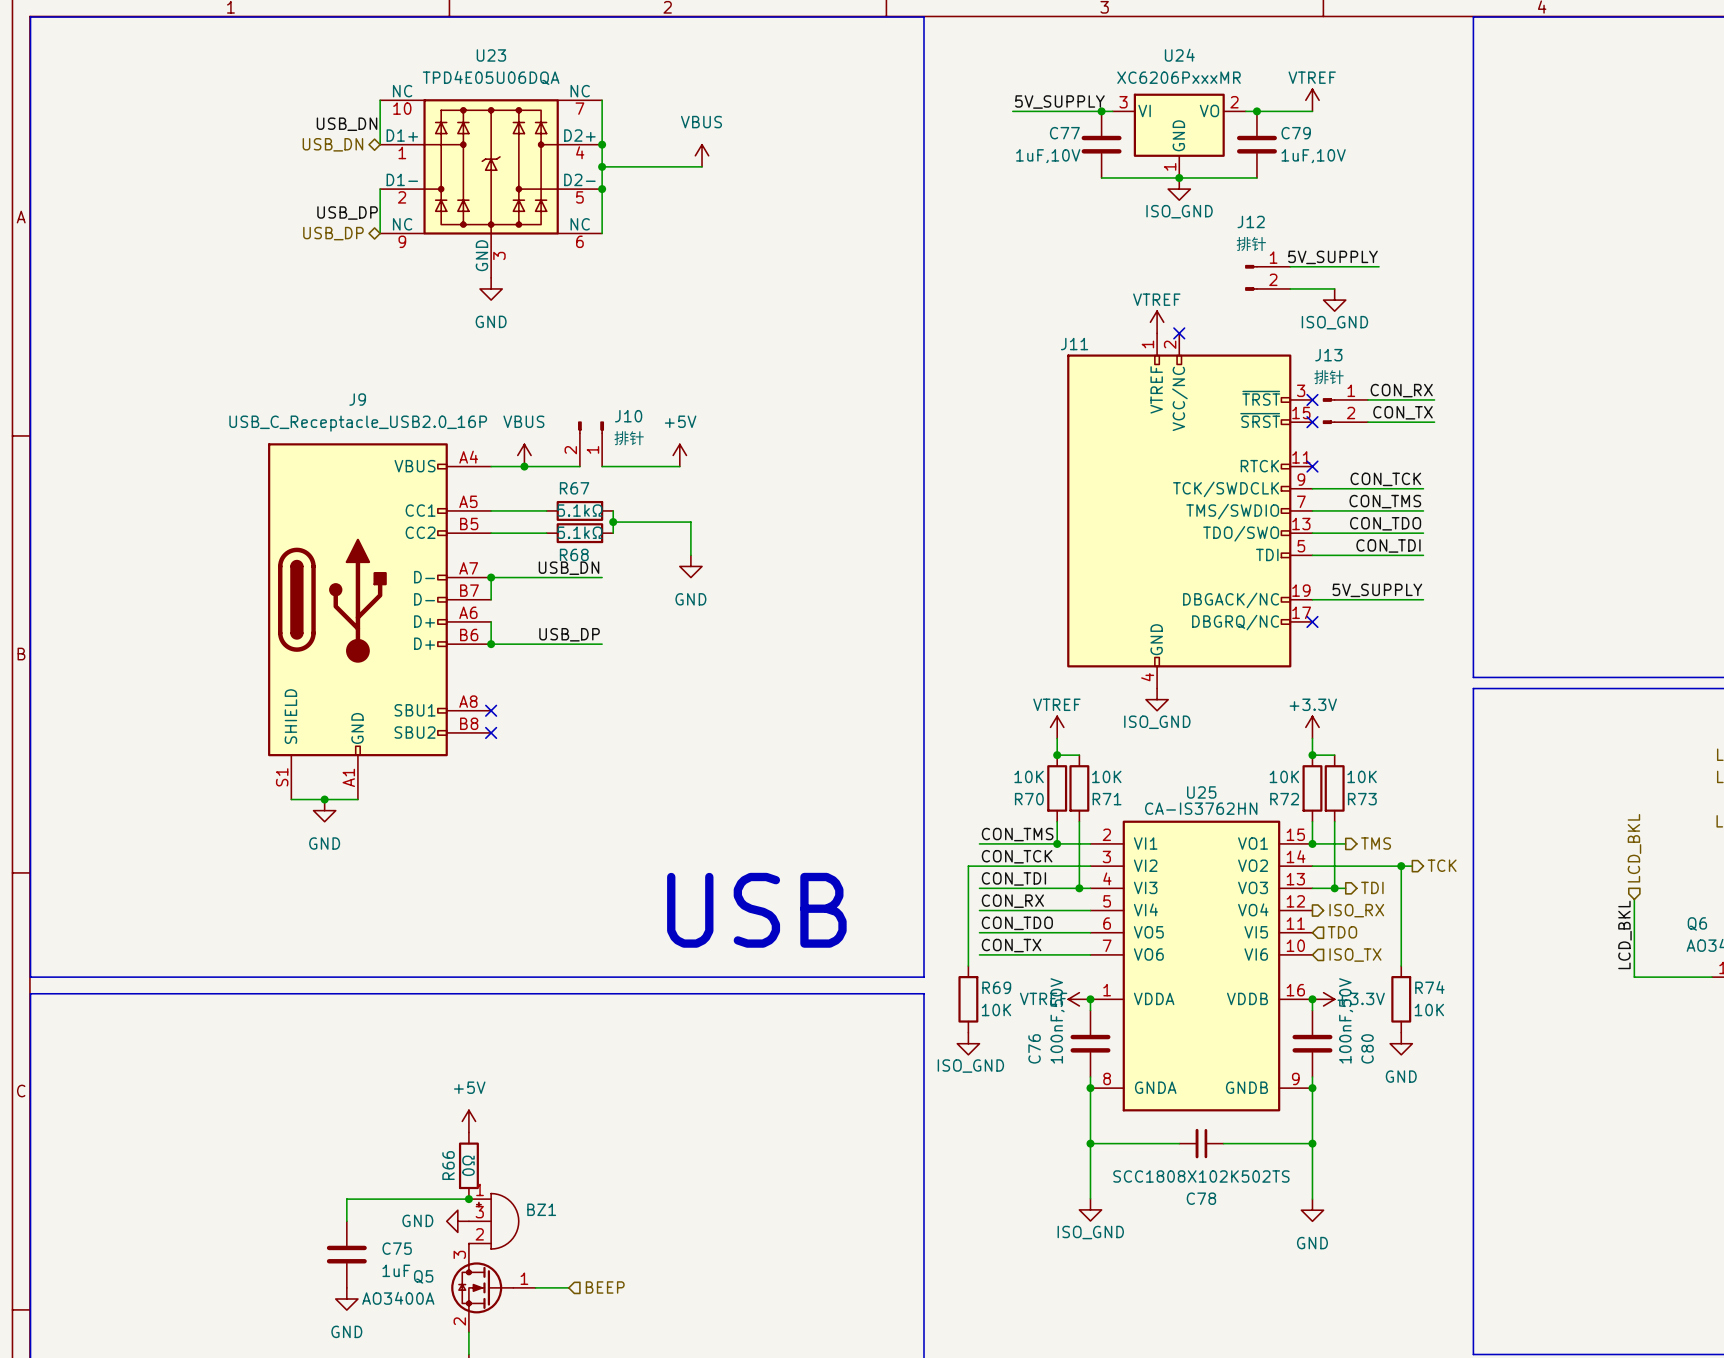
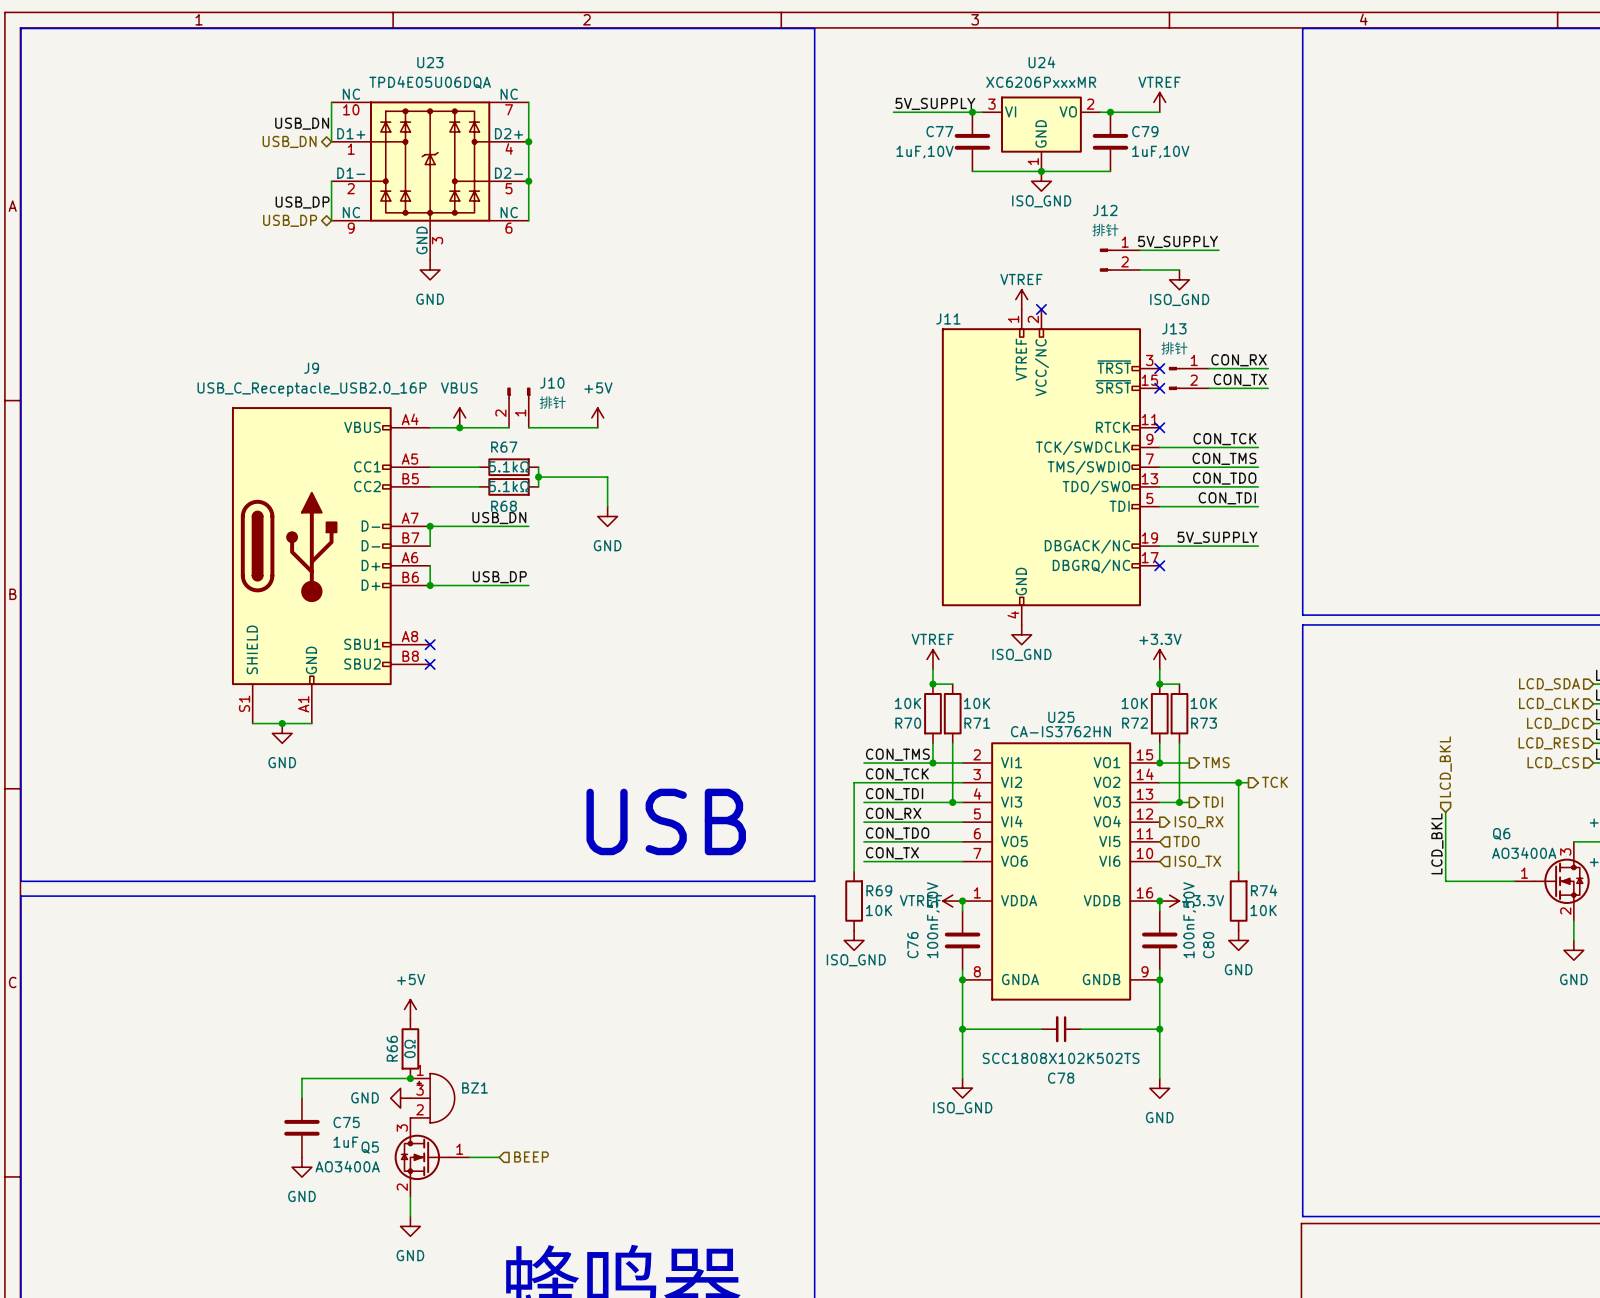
power symbol: VBUS (702, 155) -> none
wire: (602, 166) (702, 166) -> none
junction: (602, 166) -> none

